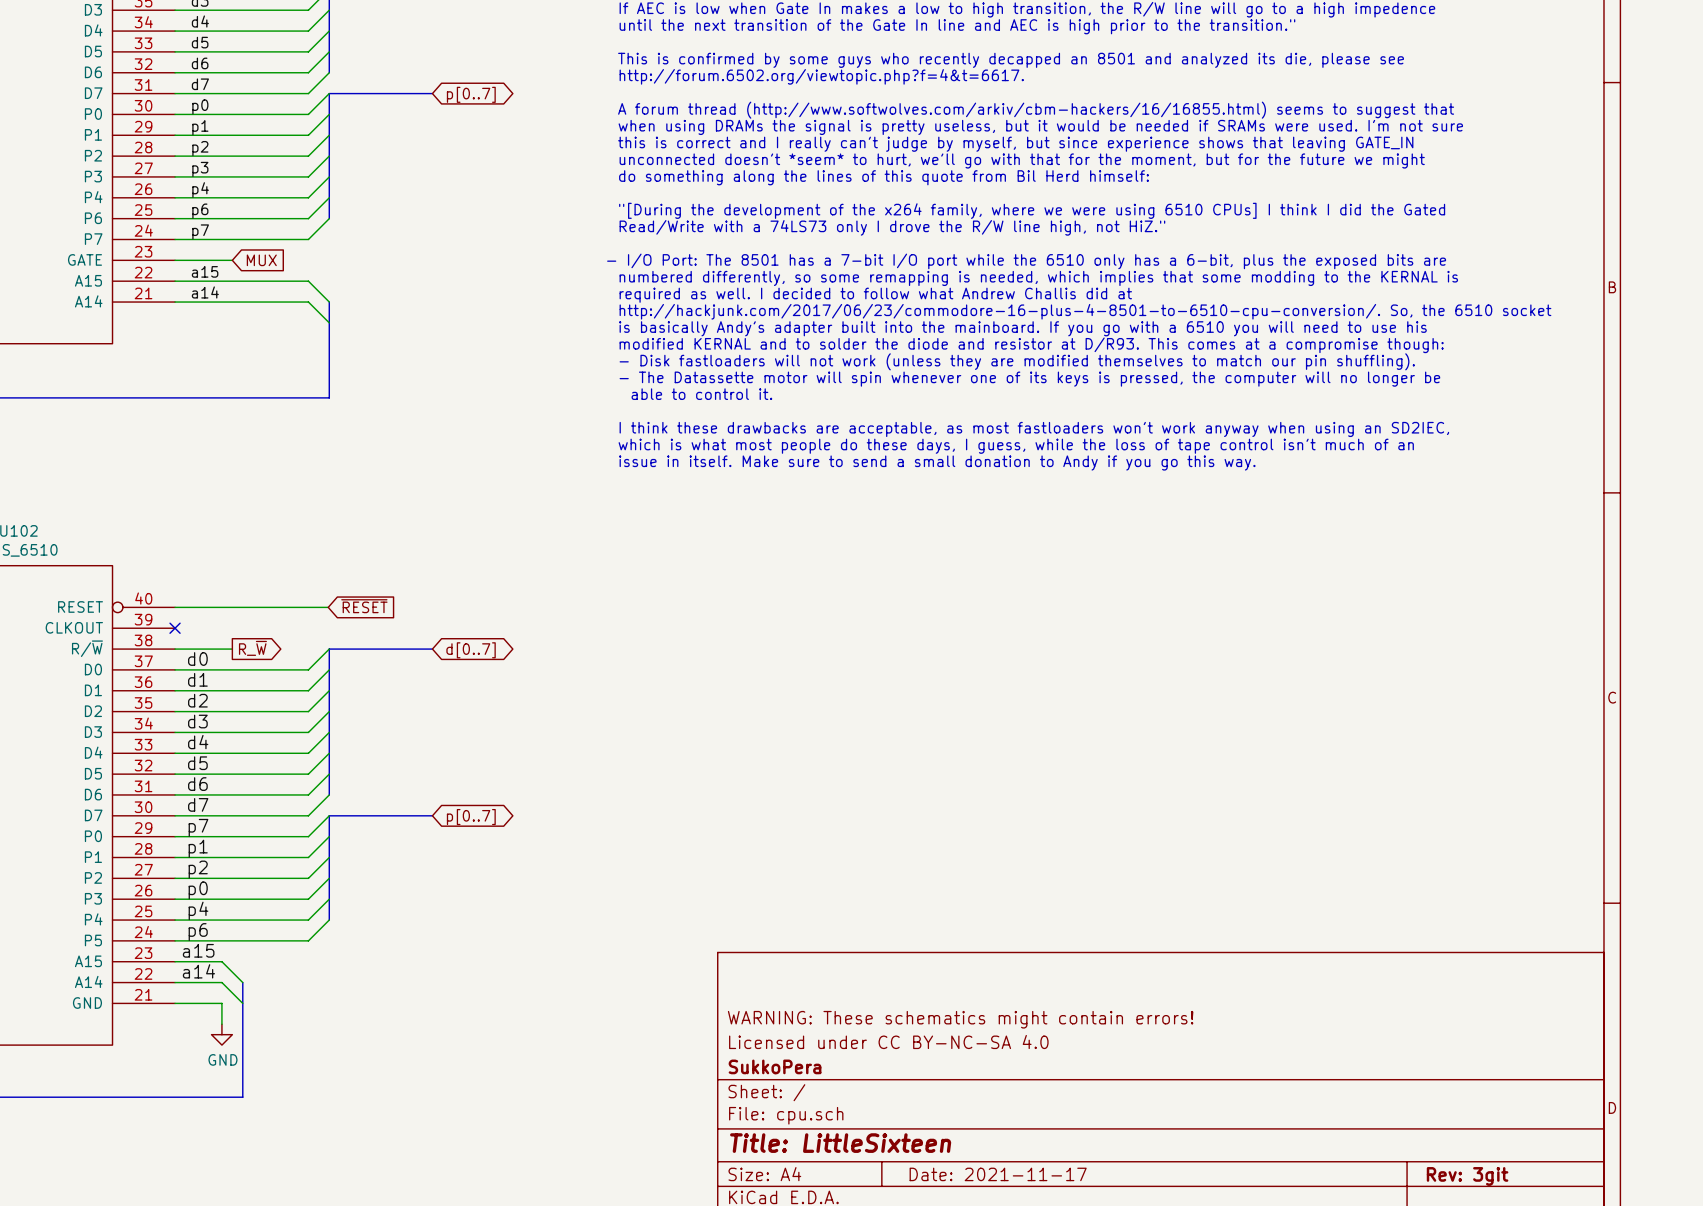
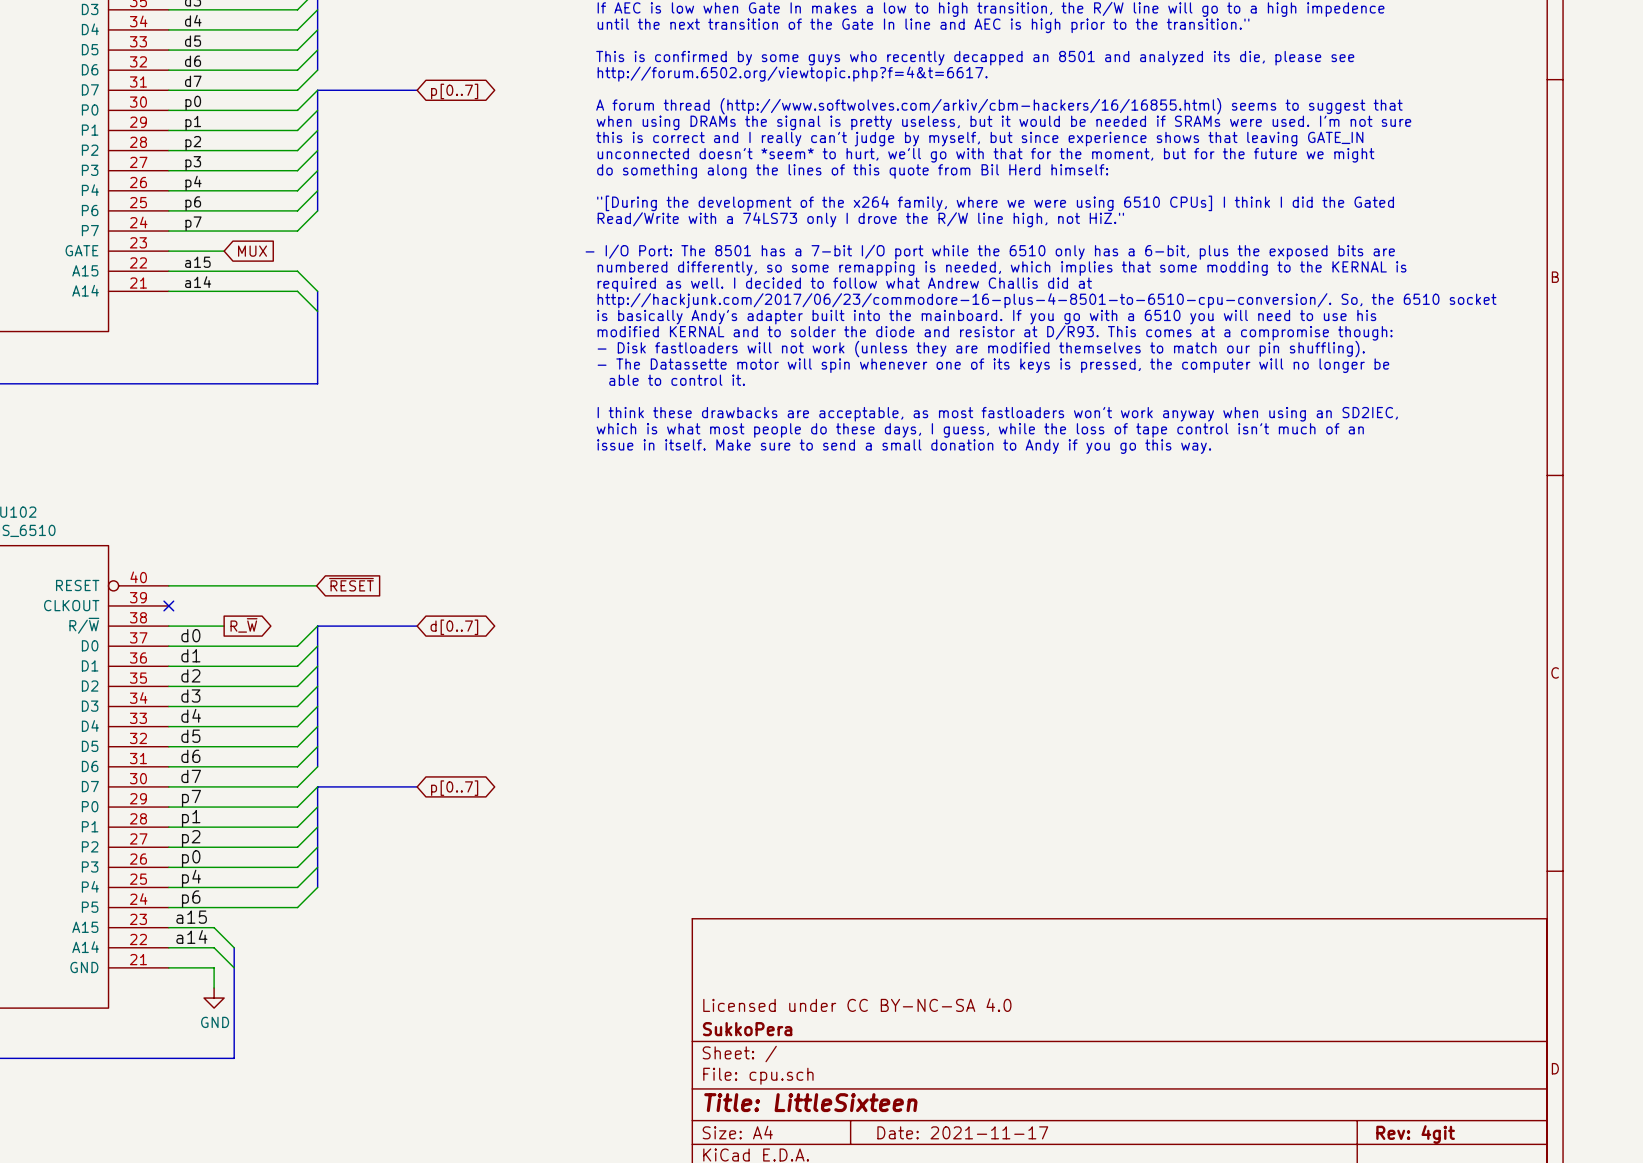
title block: WARNING: These schematics might contain errors! (960, 1019) -> none
title block: Rev: 3git (1467, 1176) -> Rev: 4git (1415, 1134)

